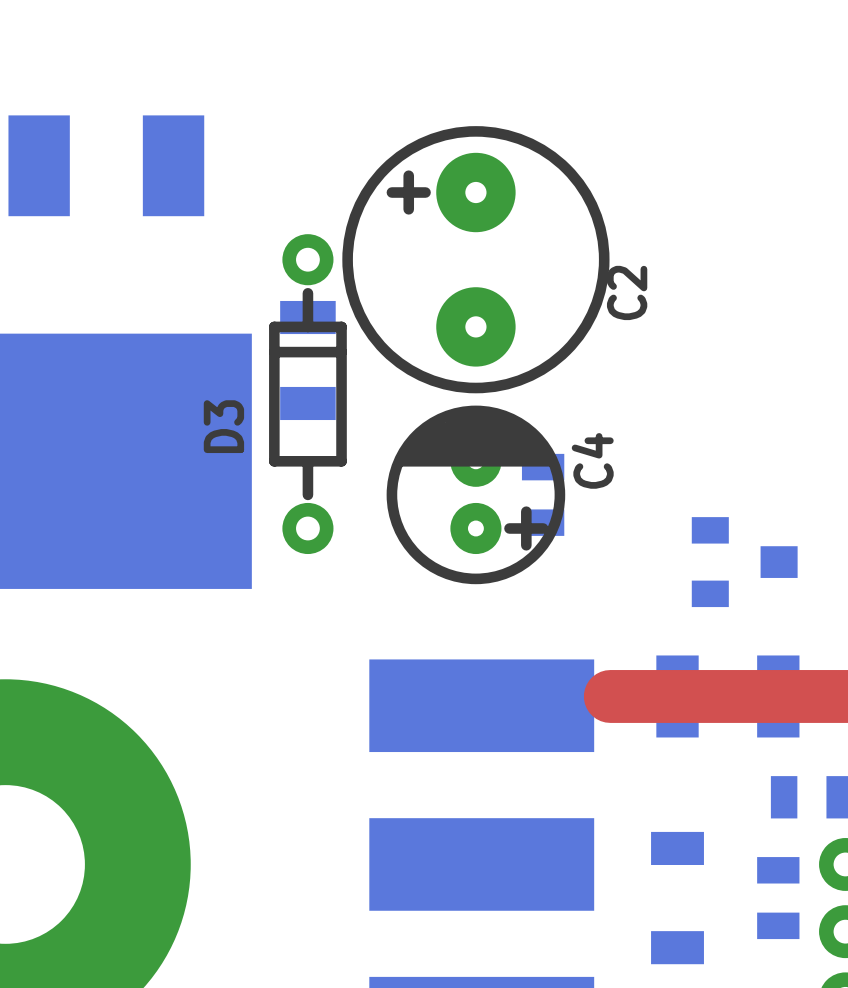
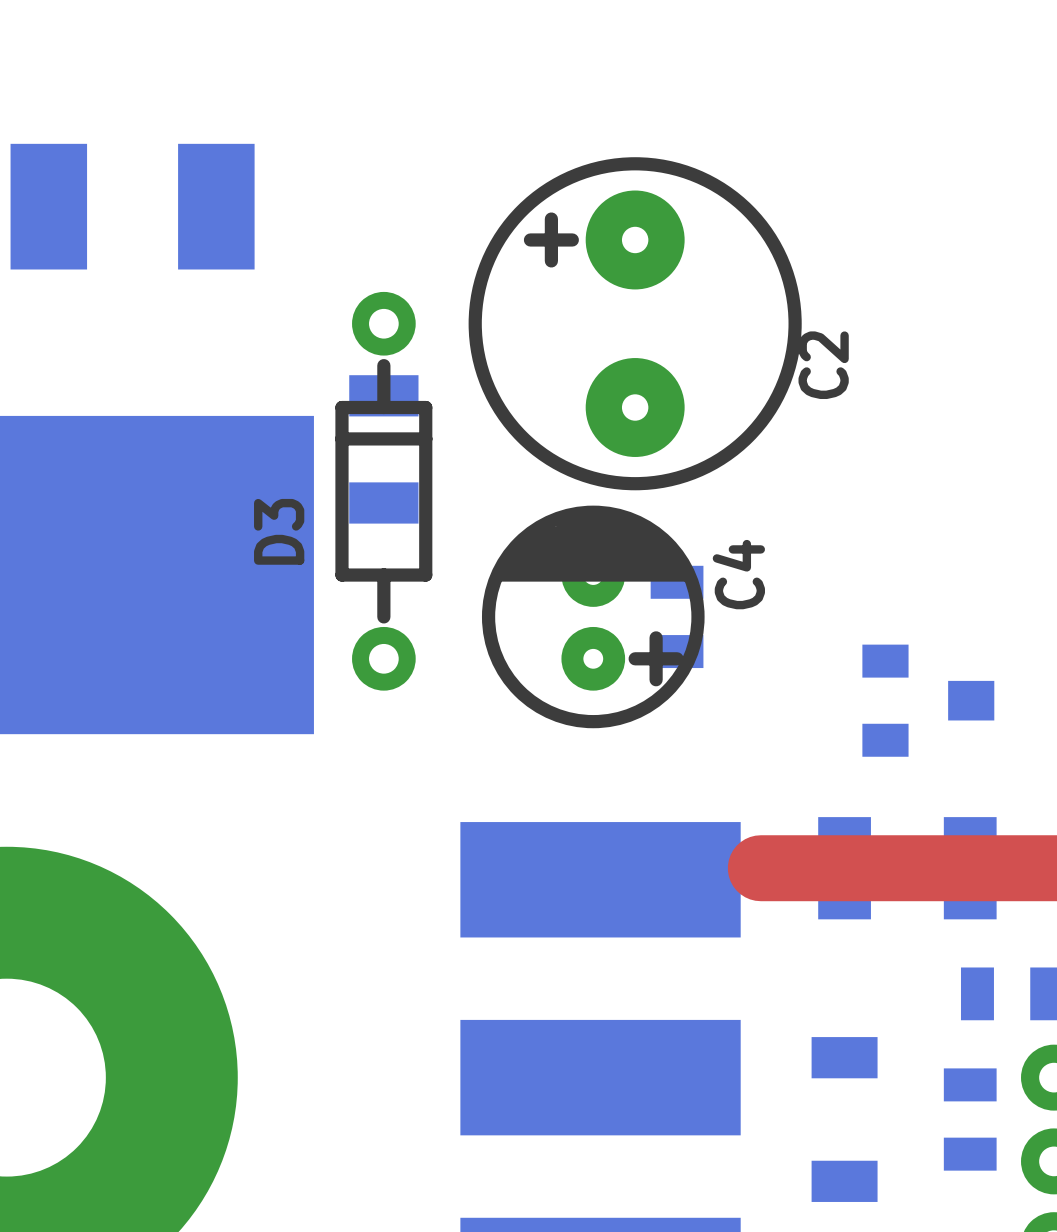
C2 position: (475, 259) -> (635, 323)

